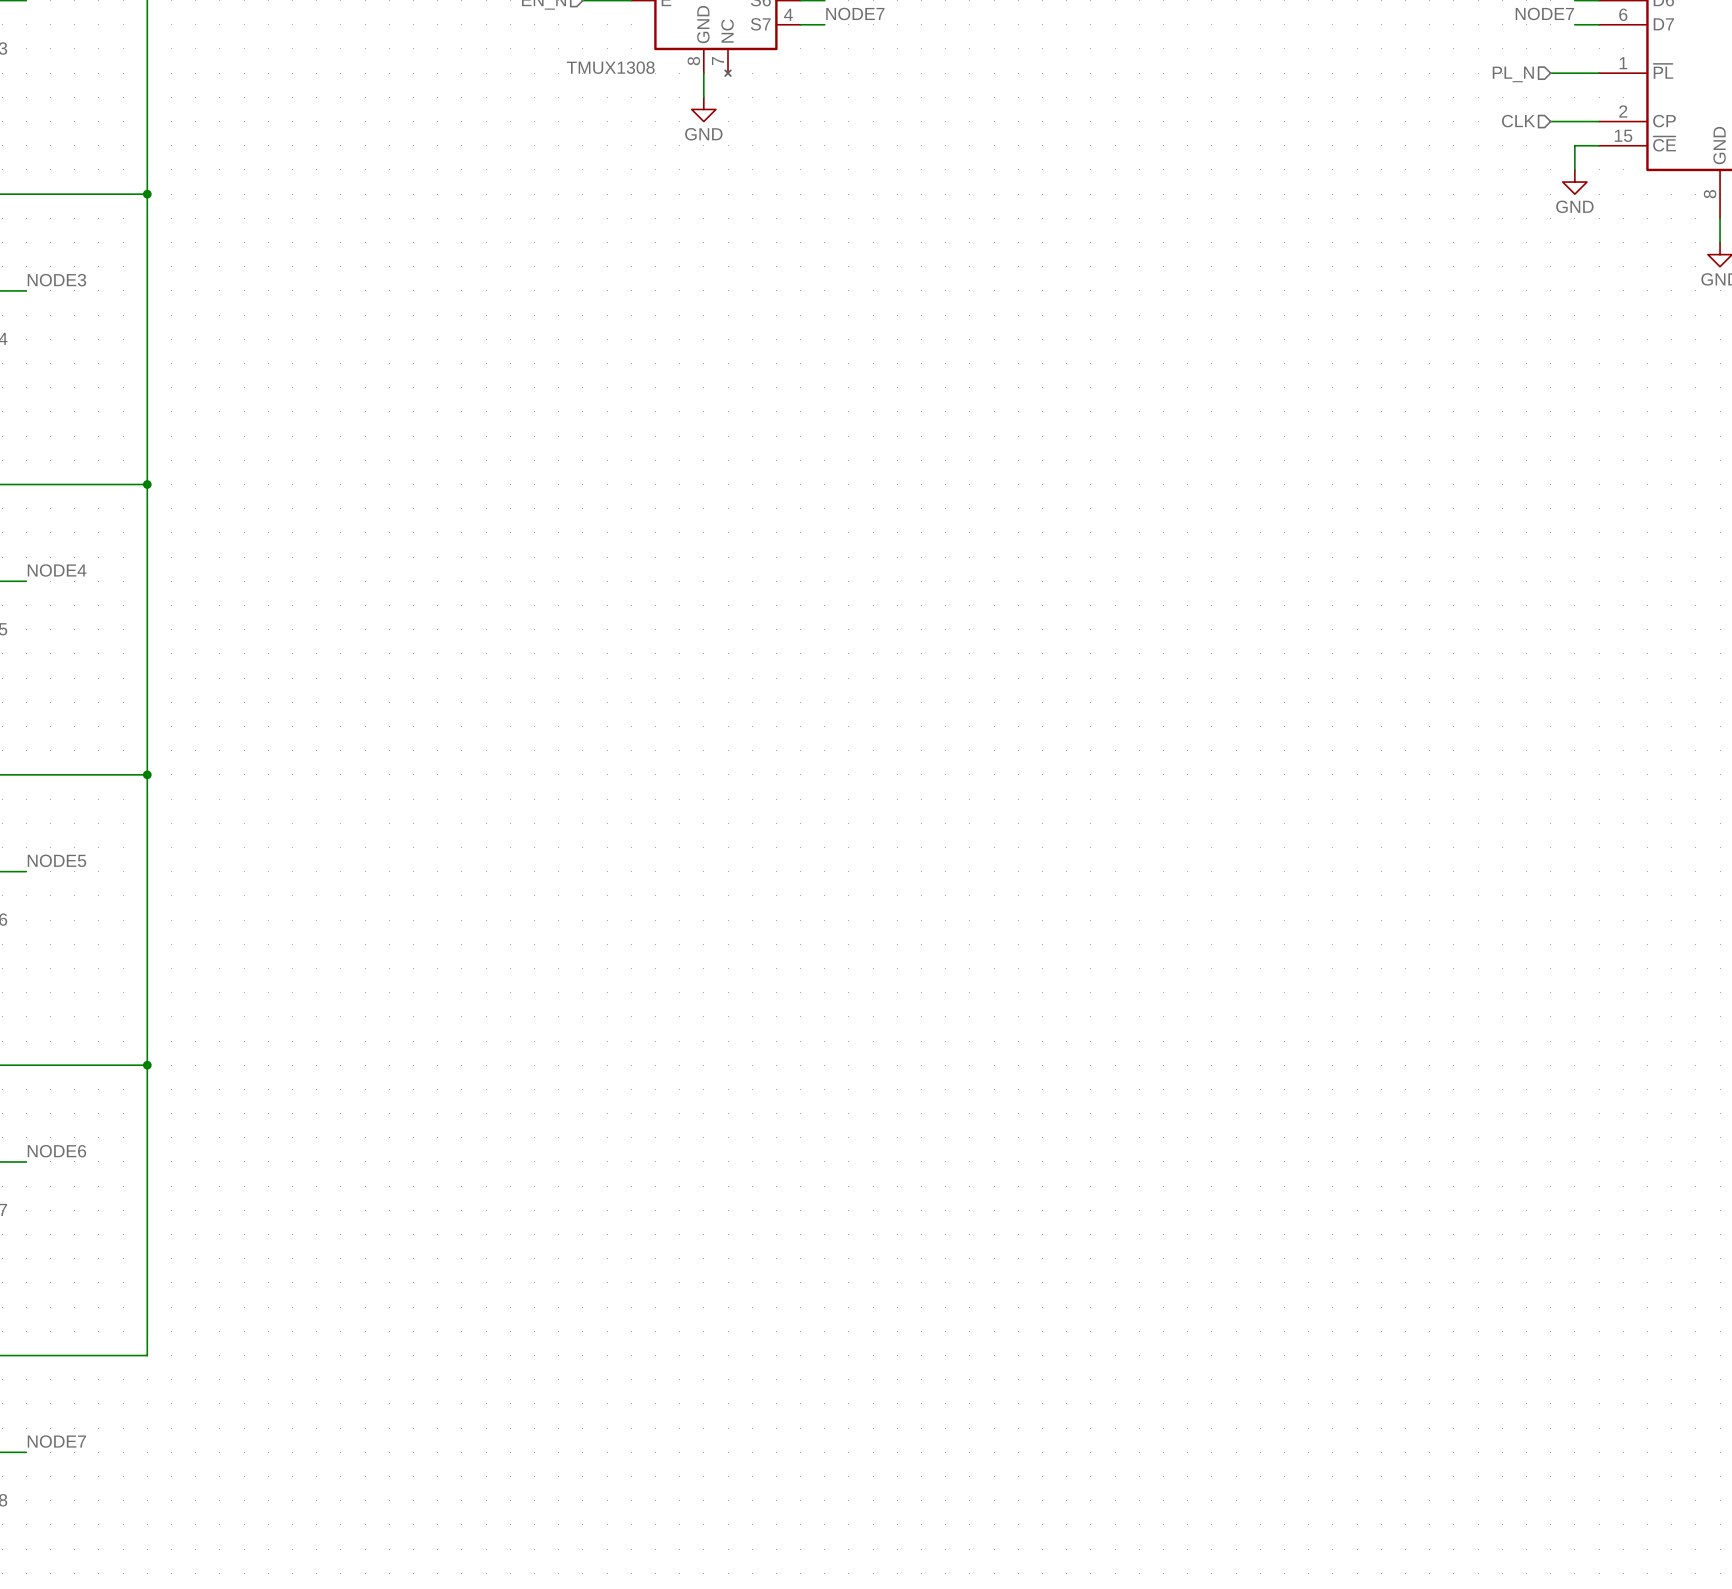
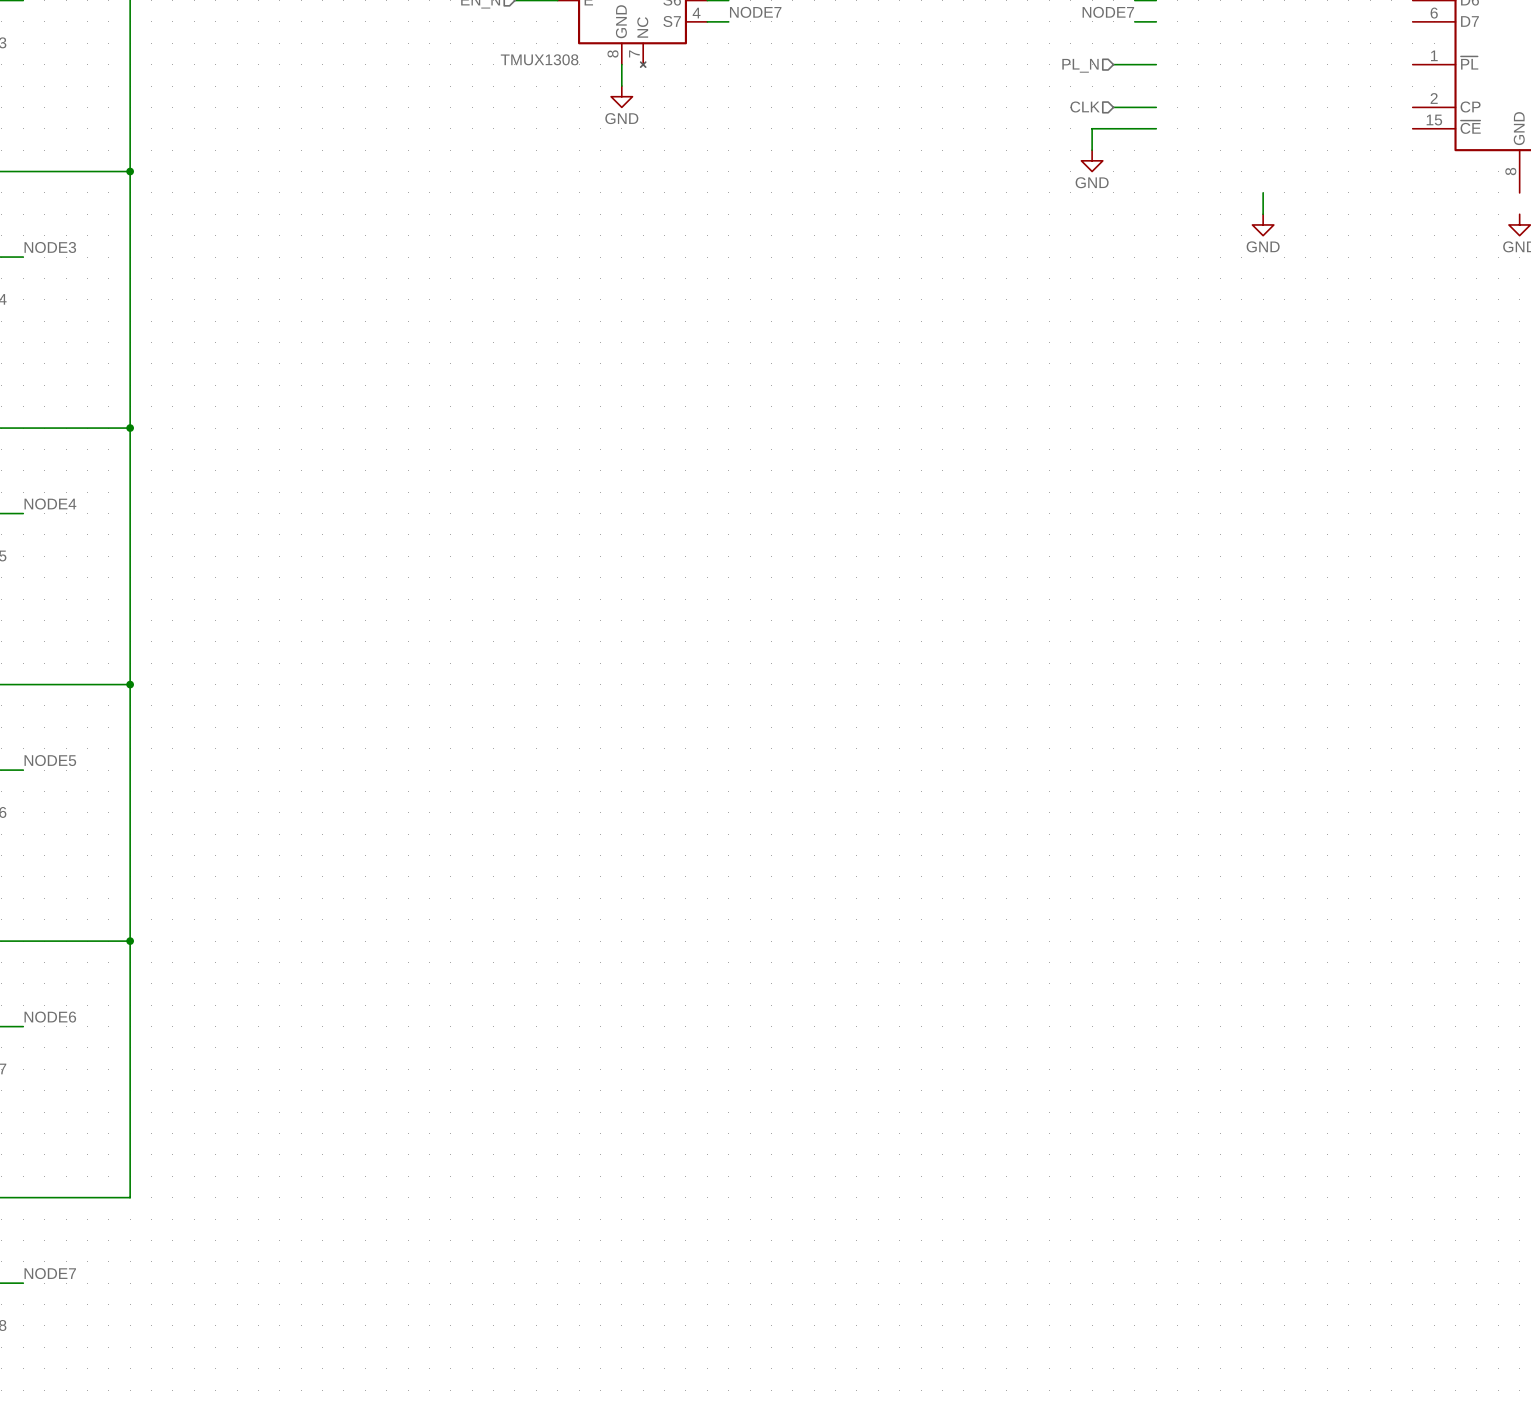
wire: none -> (1134, 0) (1156, 0)
wire: (1574, 0) (1599, 0) -> none
label: none -> NODE7 (1108, 12)
label: NODE7 (1544, 13) -> none
wire: none -> (1134, 21) (1156, 21)
wire: (1574, 24) (1599, 24) -> none
wire: none -> (1113, 64) (1156, 64)
wire: (1550, 73) (1599, 73) -> none
hierarchical label: none -> PL_N (1080, 65)
hierarchical label: PL_N (1513, 74) -> none
hierarchical label: none -> CLK (1085, 106)
wire: none -> (1113, 107) (1156, 107)
hierarchical label: CLK (1518, 121) -> none
wire: (1550, 121) (1599, 121) -> none
wire: none -> (1156, 128) (1092, 128) (1092, 150)
wire: (1599, 145) (1574, 145) (1574, 169) -> none
power symbol: none -> GND (1092, 160)
power symbol position: GND (1574, 182) -> GND (1263, 224)
wire: none -> (1263, 192) (1263, 214)
wire: (1720, 218) (1720, 242) -> none

